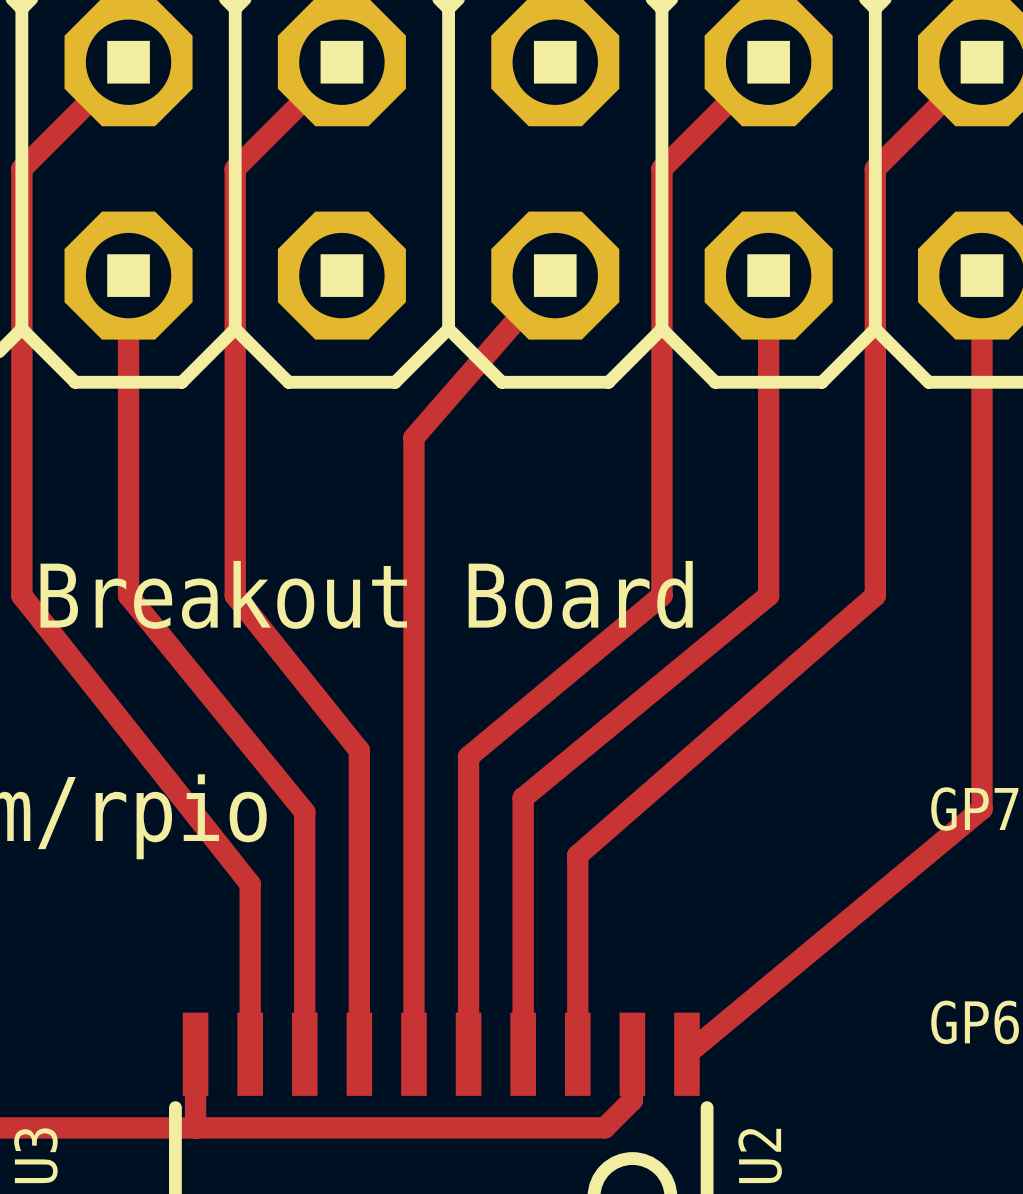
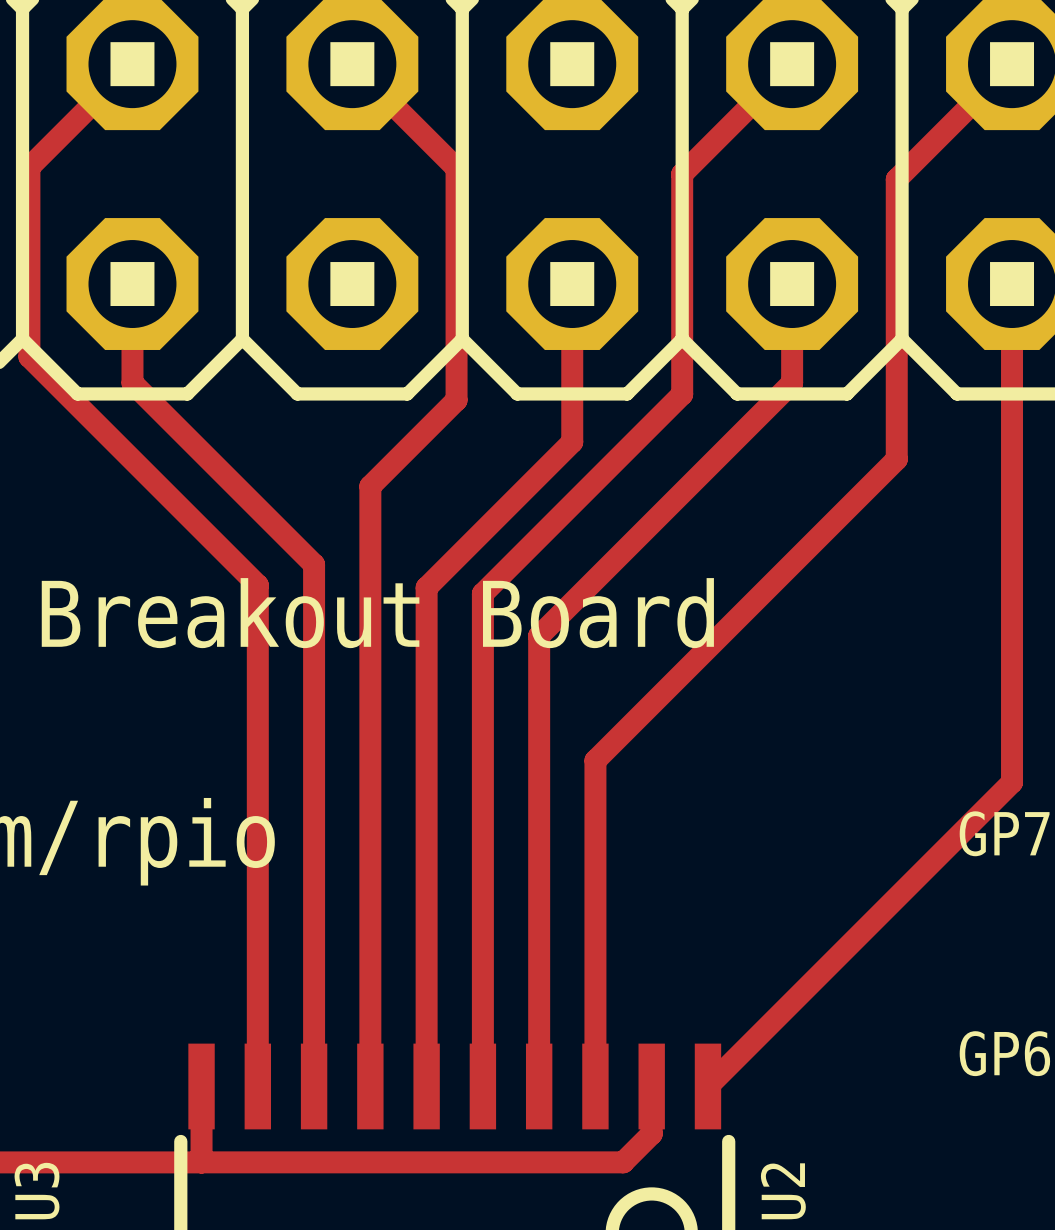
track: (341, 62) (235, 168) (235, 595) (359, 750) -> (352, 64) (456, 168) (456, 400) (370, 486) (370, 773)
track: (28, 162) (21, 168) (21, 595) (250, 884) -> (29, 167) (29, 356) (257, 585) (257, 911)
track: (875, 168) (875, 595) (577, 855) -> (902, 174) (896, 179) (896, 459) (595, 760) (595, 881)
track: (555, 275) (413, 437) (413, 570) -> (572, 284) (572, 442) (426, 587)
track: (128, 371) (128, 595) (304, 812) -> (132, 382) (314, 564) (314, 836)
track: (768, 371) (768, 595) (523, 797) -> (792, 382) (539, 635) (539, 822)
track: (661, 382) (661, 595) (468, 756) -> (682, 394) (482, 593) (482, 780)
track: (981, 759) (981, 808) (686, 1054) -> (1012, 782) (707, 1086)

